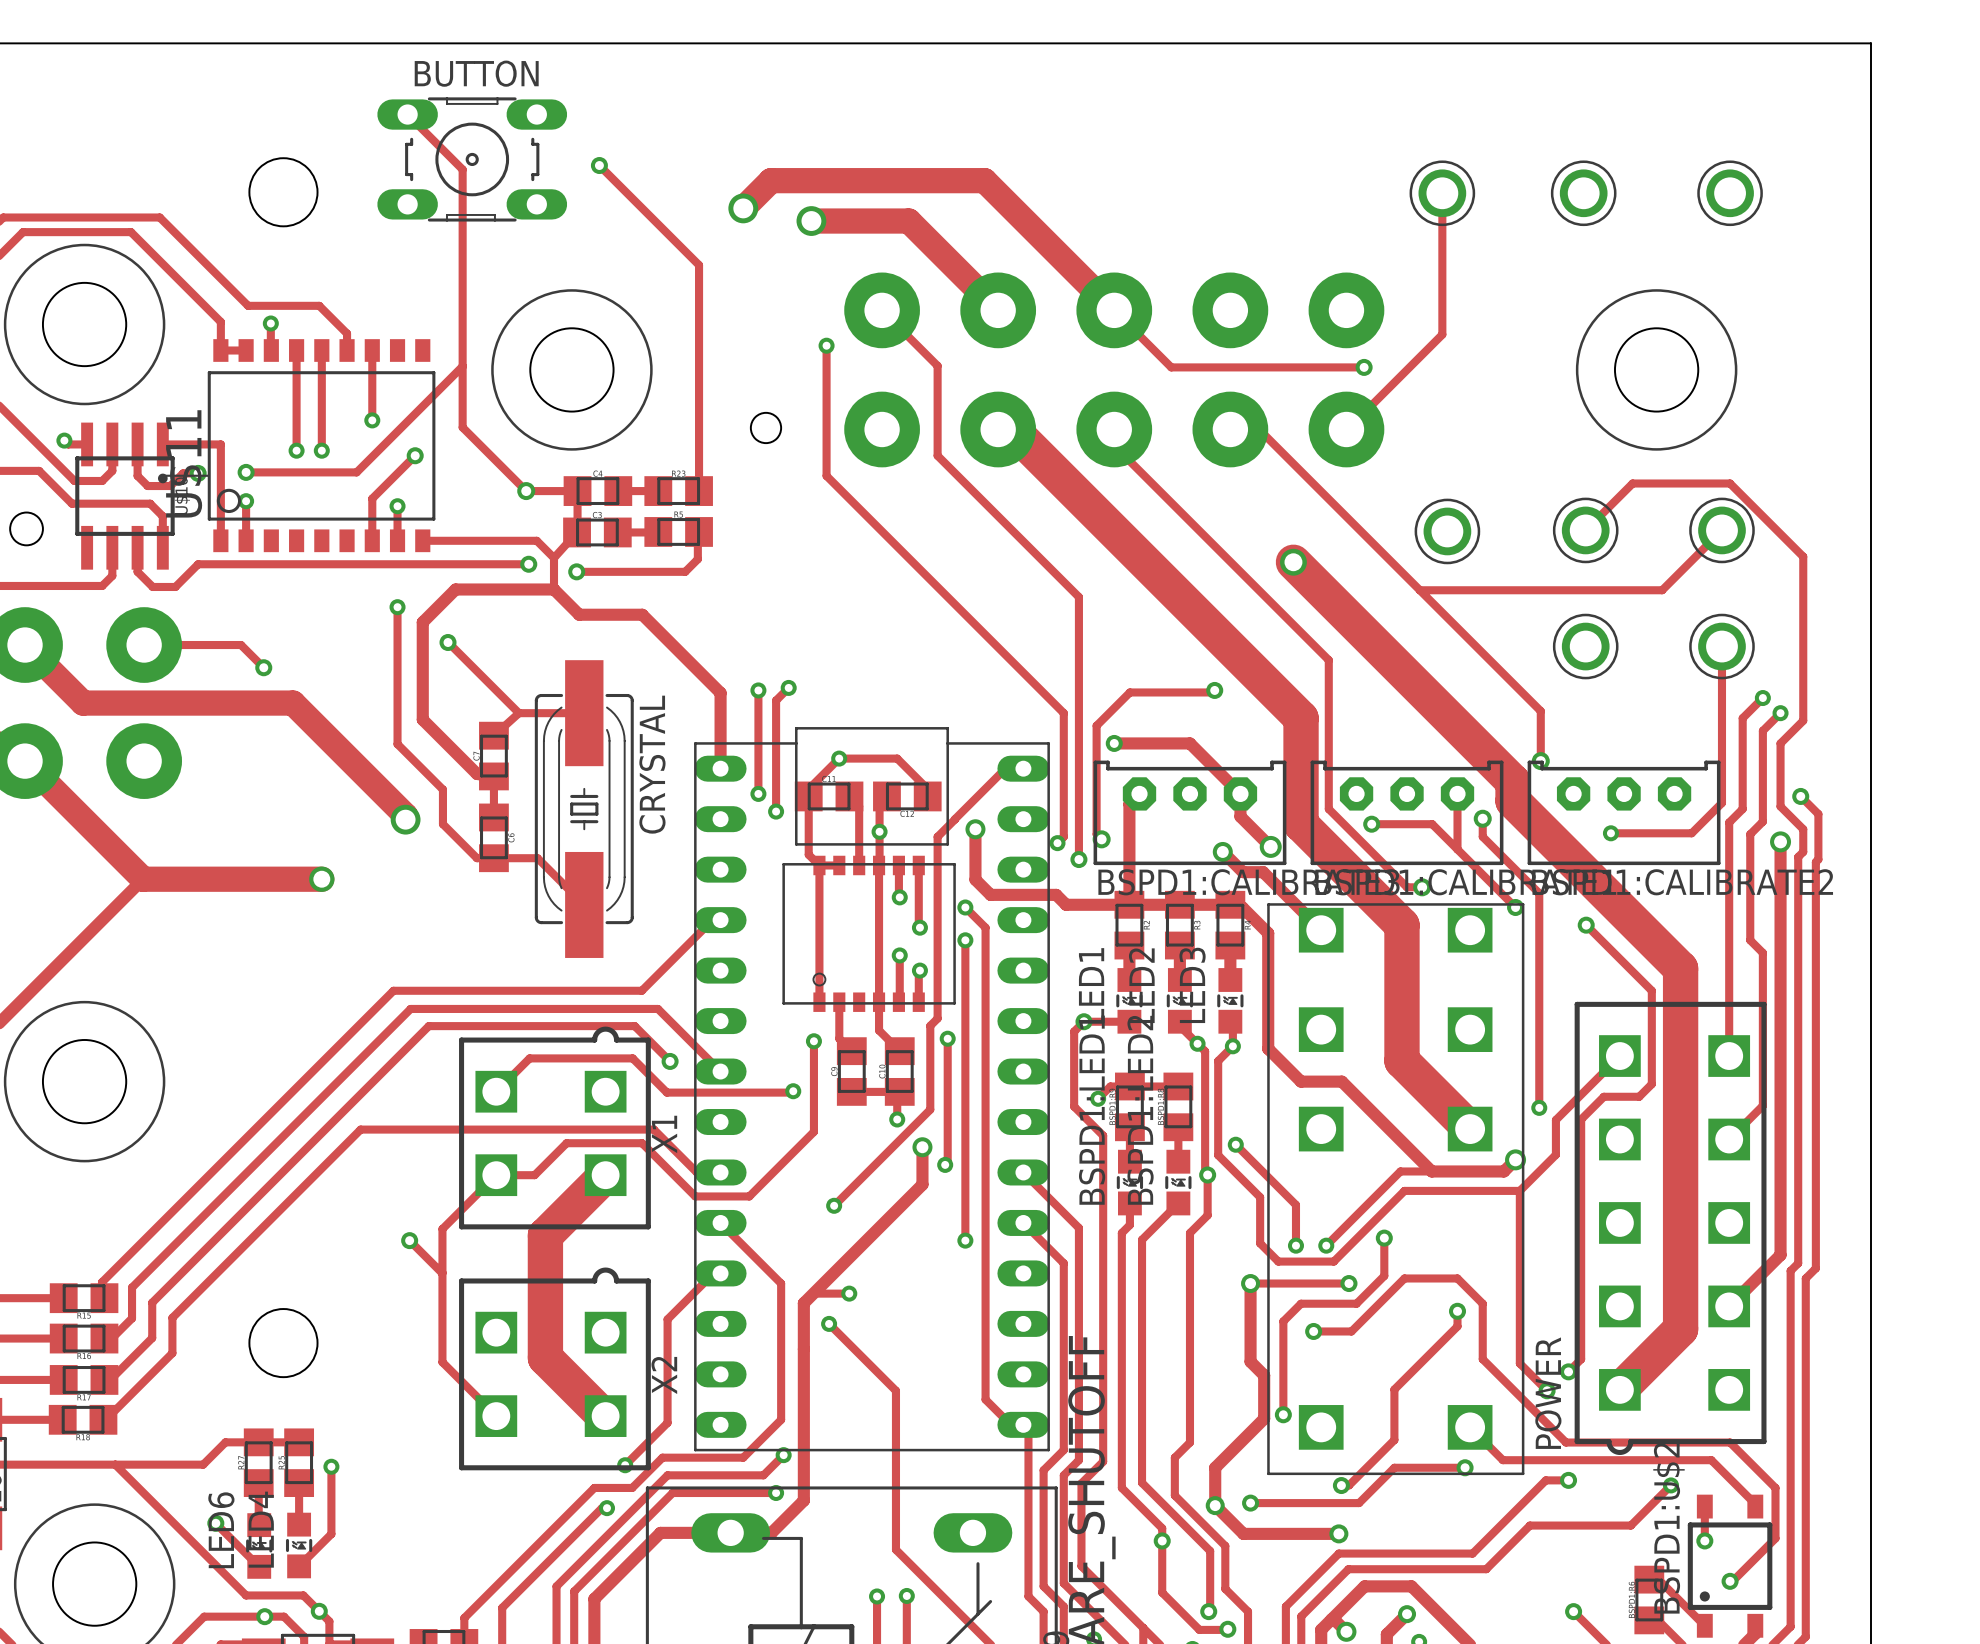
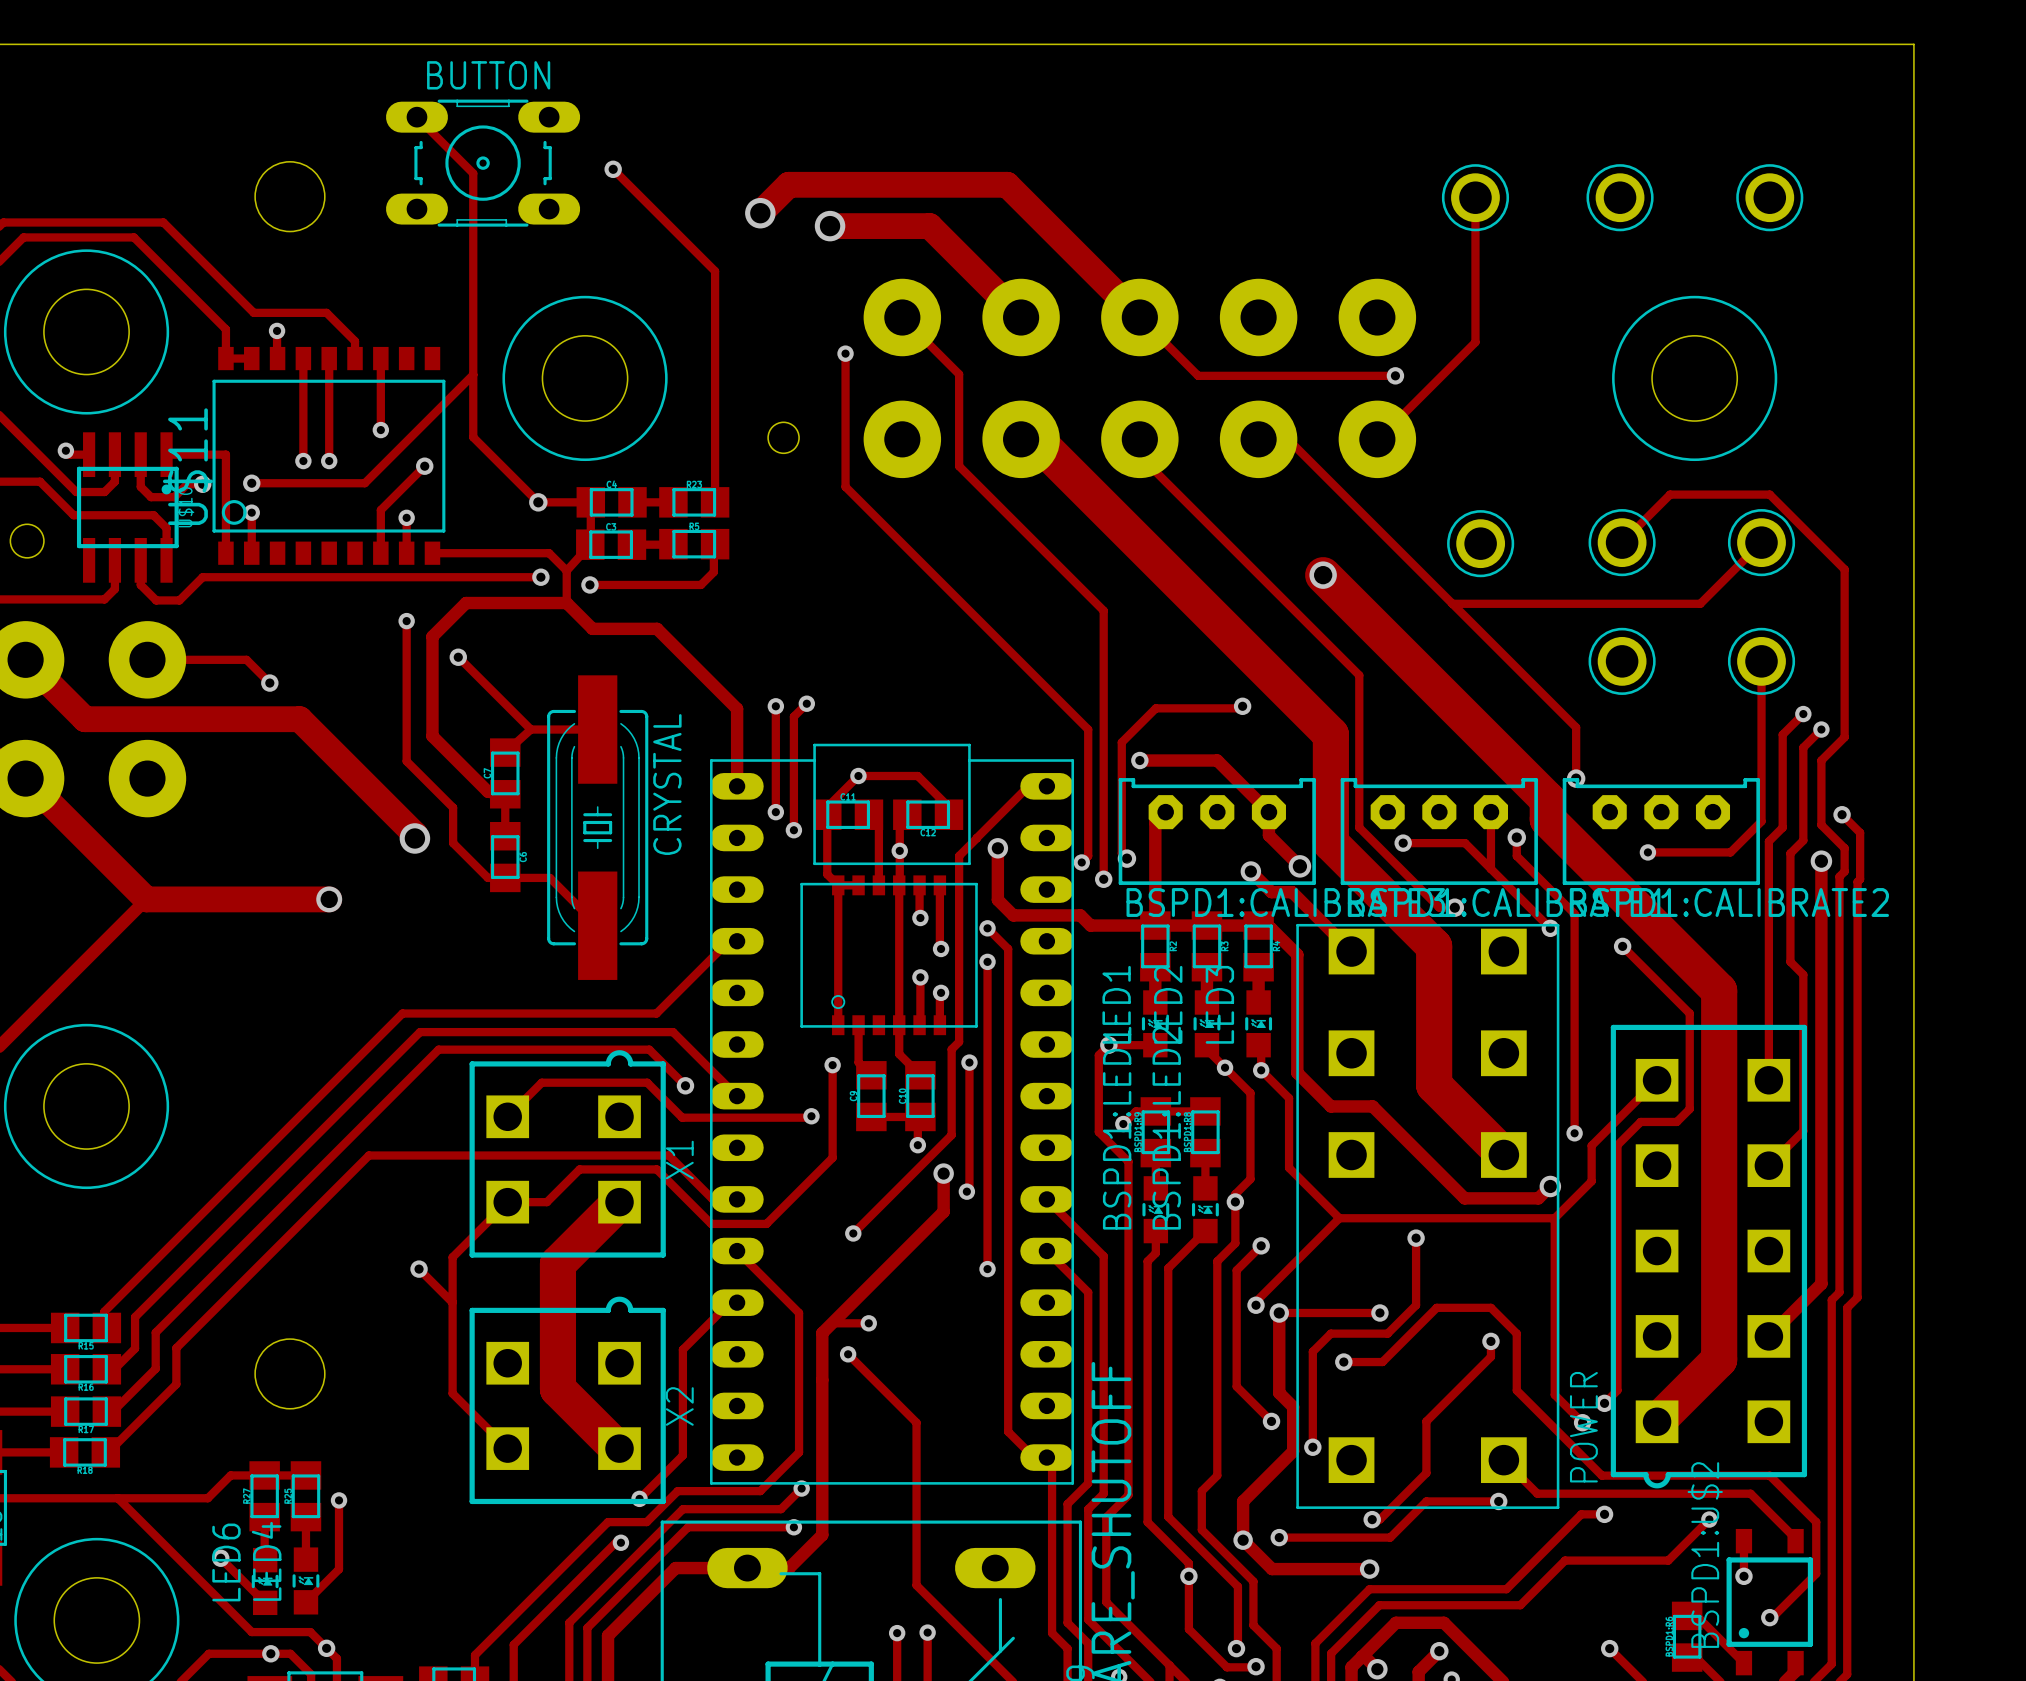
track: (1232, 1046) (1218, 1061) (1218, 1155) (1260, 1197) (1260, 1243) (1278, 1261) (1333, 1261) (1404, 1190) -> (1261, 1070) (1289, 1098) (1289, 1167) (1339, 1218)
track: (1205, 1051) (1205, 1172) (1207, 1175) -> (1232, 1075) (1250, 1093) (1250, 1179) (1235, 1194) (1235, 1201)
track: (1235, 1144) (1295, 1204) (1295, 1245) -> none
via: (1235, 1144) -> none
track: (1431, 1171) (1400, 1171) (1326, 1245) -> none
track: none -> (1339, 1218) (1436, 1218)
track: none -> (1339, 1218) (1256, 1301) (1256, 1305)
track: none -> (1416, 1238) (1416, 1266)
track: none -> (1261, 1245) (1236, 1270) (1236, 1386) (1271, 1421)
via: none -> (1261, 1245)
via position: (1384, 1238) -> (1416, 1238)
via: (1295, 1245) -> none
via: (1326, 1245) -> none
via: none -> (1256, 1305)
via: none -> (1271, 1421)

